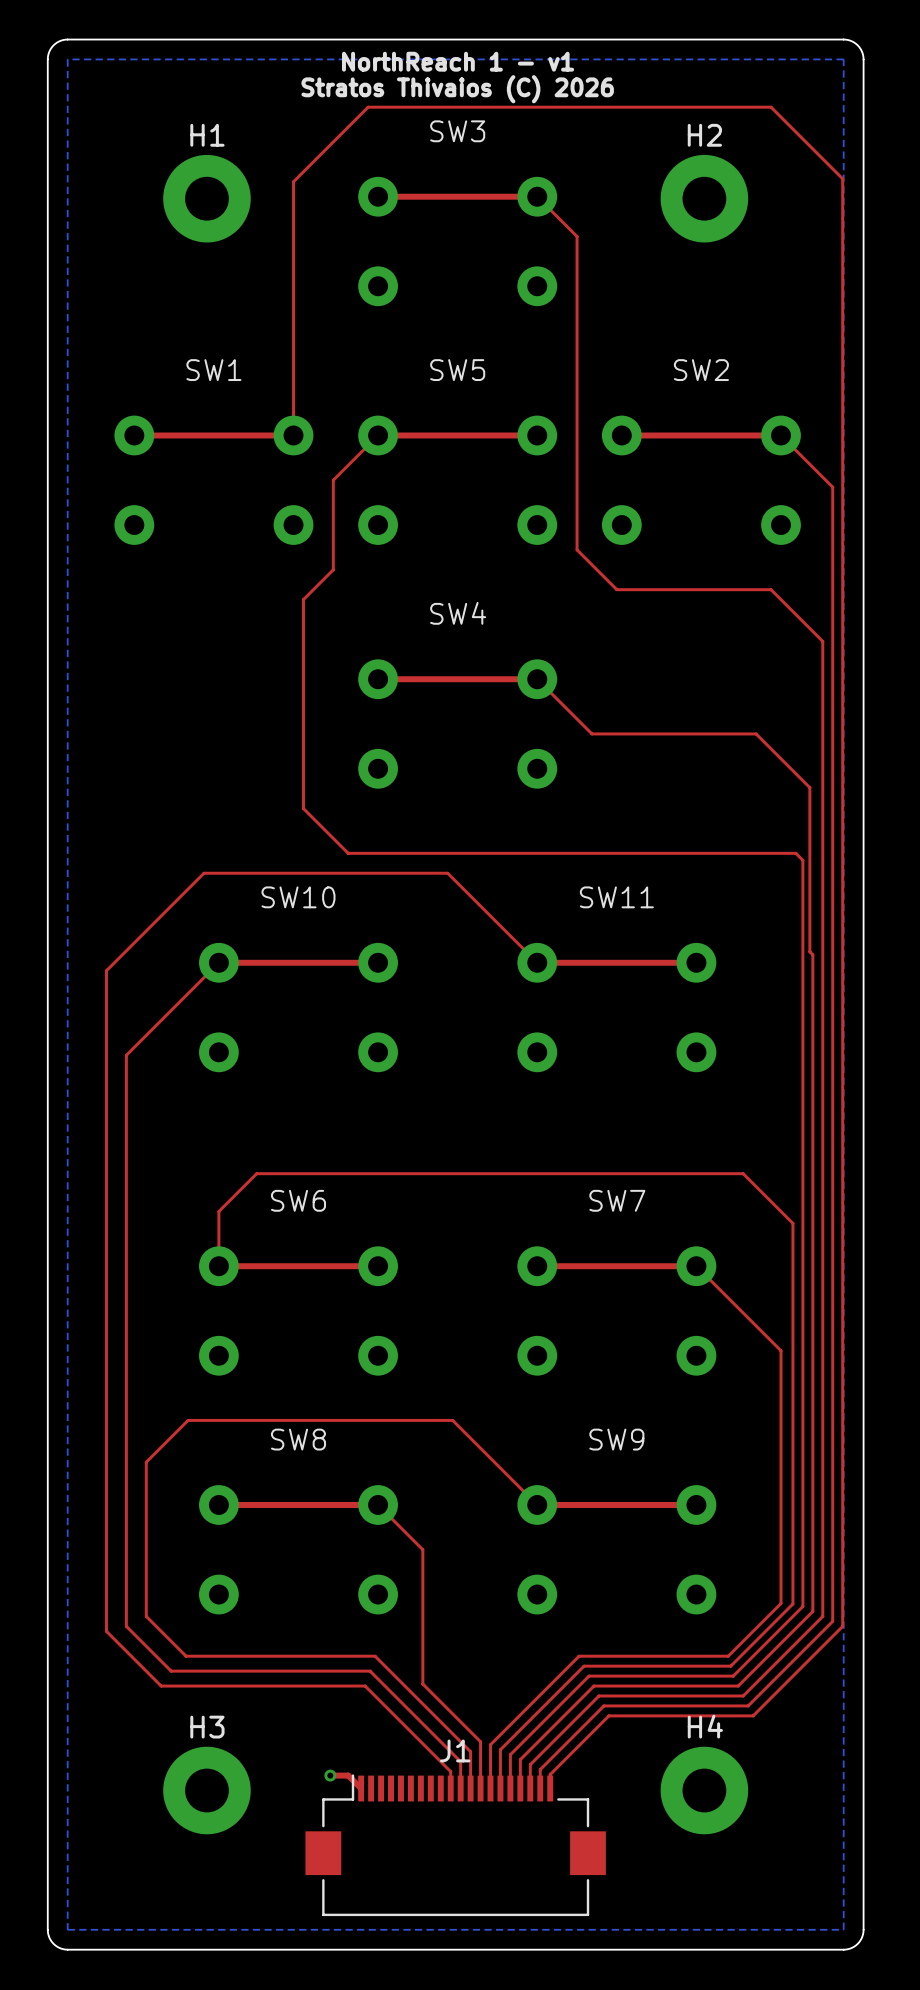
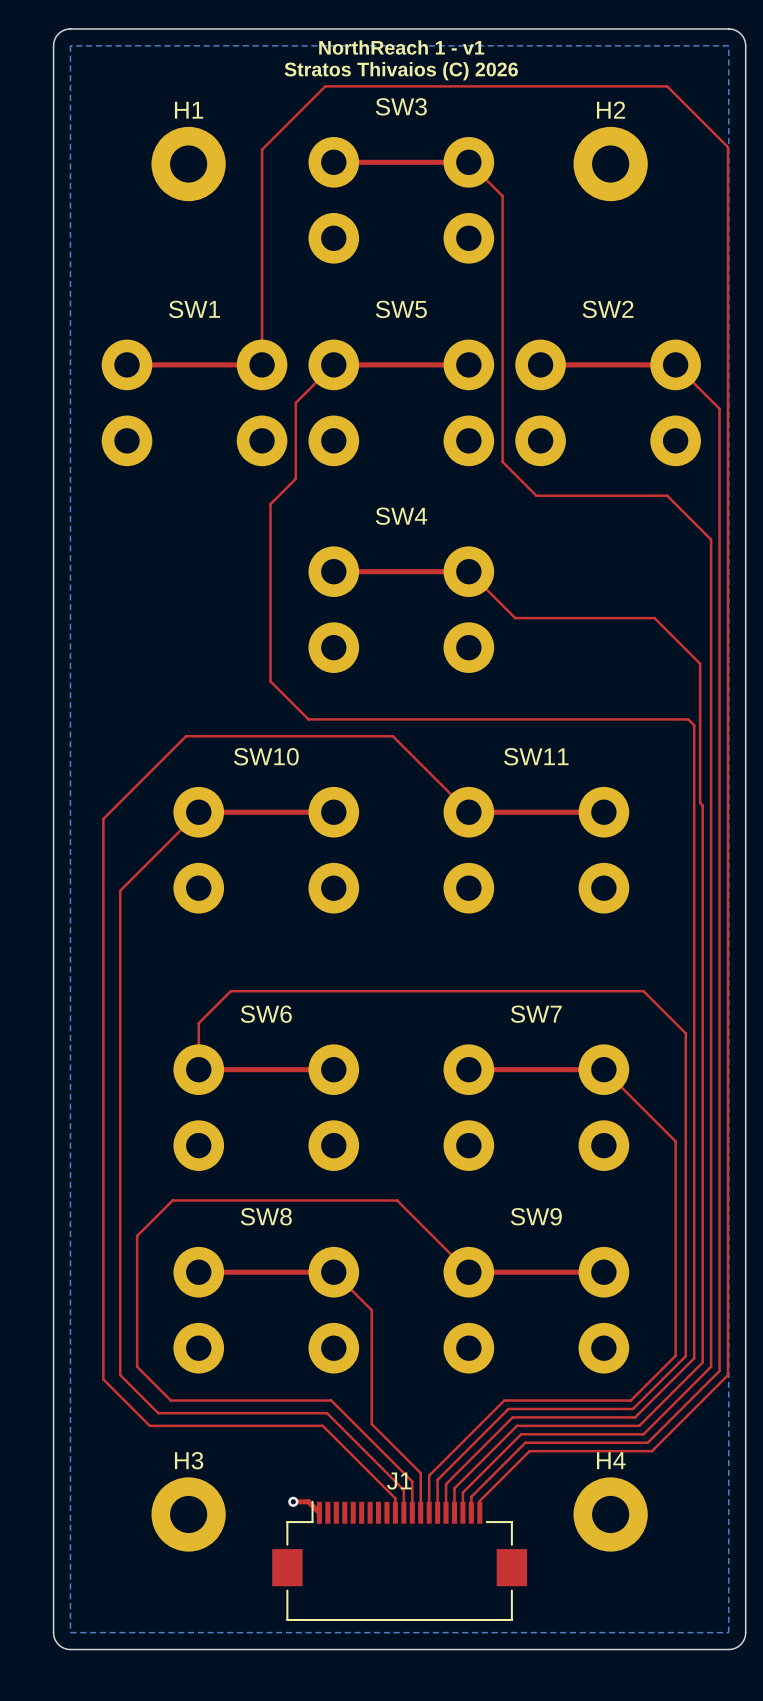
SW3 footprint: [358, 176, 558, 307] -> [308, 137, 495, 264]
SW1 footprint: [114, 415, 314, 545] -> [101, 339, 288, 467]
SW5 footprint: [358, 415, 558, 545] -> [308, 339, 495, 467]
SW2 footprint: [601, 415, 801, 545] -> [515, 339, 701, 467]
SW4 footprint: [358, 659, 558, 789] -> [308, 546, 495, 673]
SW10 footprint: [199, 942, 398, 1073] -> [173, 786, 360, 914]
SW11 footprint: [517, 942, 717, 1073] -> [443, 786, 630, 914]
SW6 footprint: [199, 1246, 398, 1376] -> [173, 1044, 360, 1171]
SW7 footprint: [517, 1246, 717, 1376] -> [443, 1044, 630, 1171]
SW8 footprint: [199, 1485, 398, 1615] -> [173, 1246, 360, 1374]
SW9 footprint: [517, 1485, 717, 1615] -> [443, 1246, 630, 1374]

